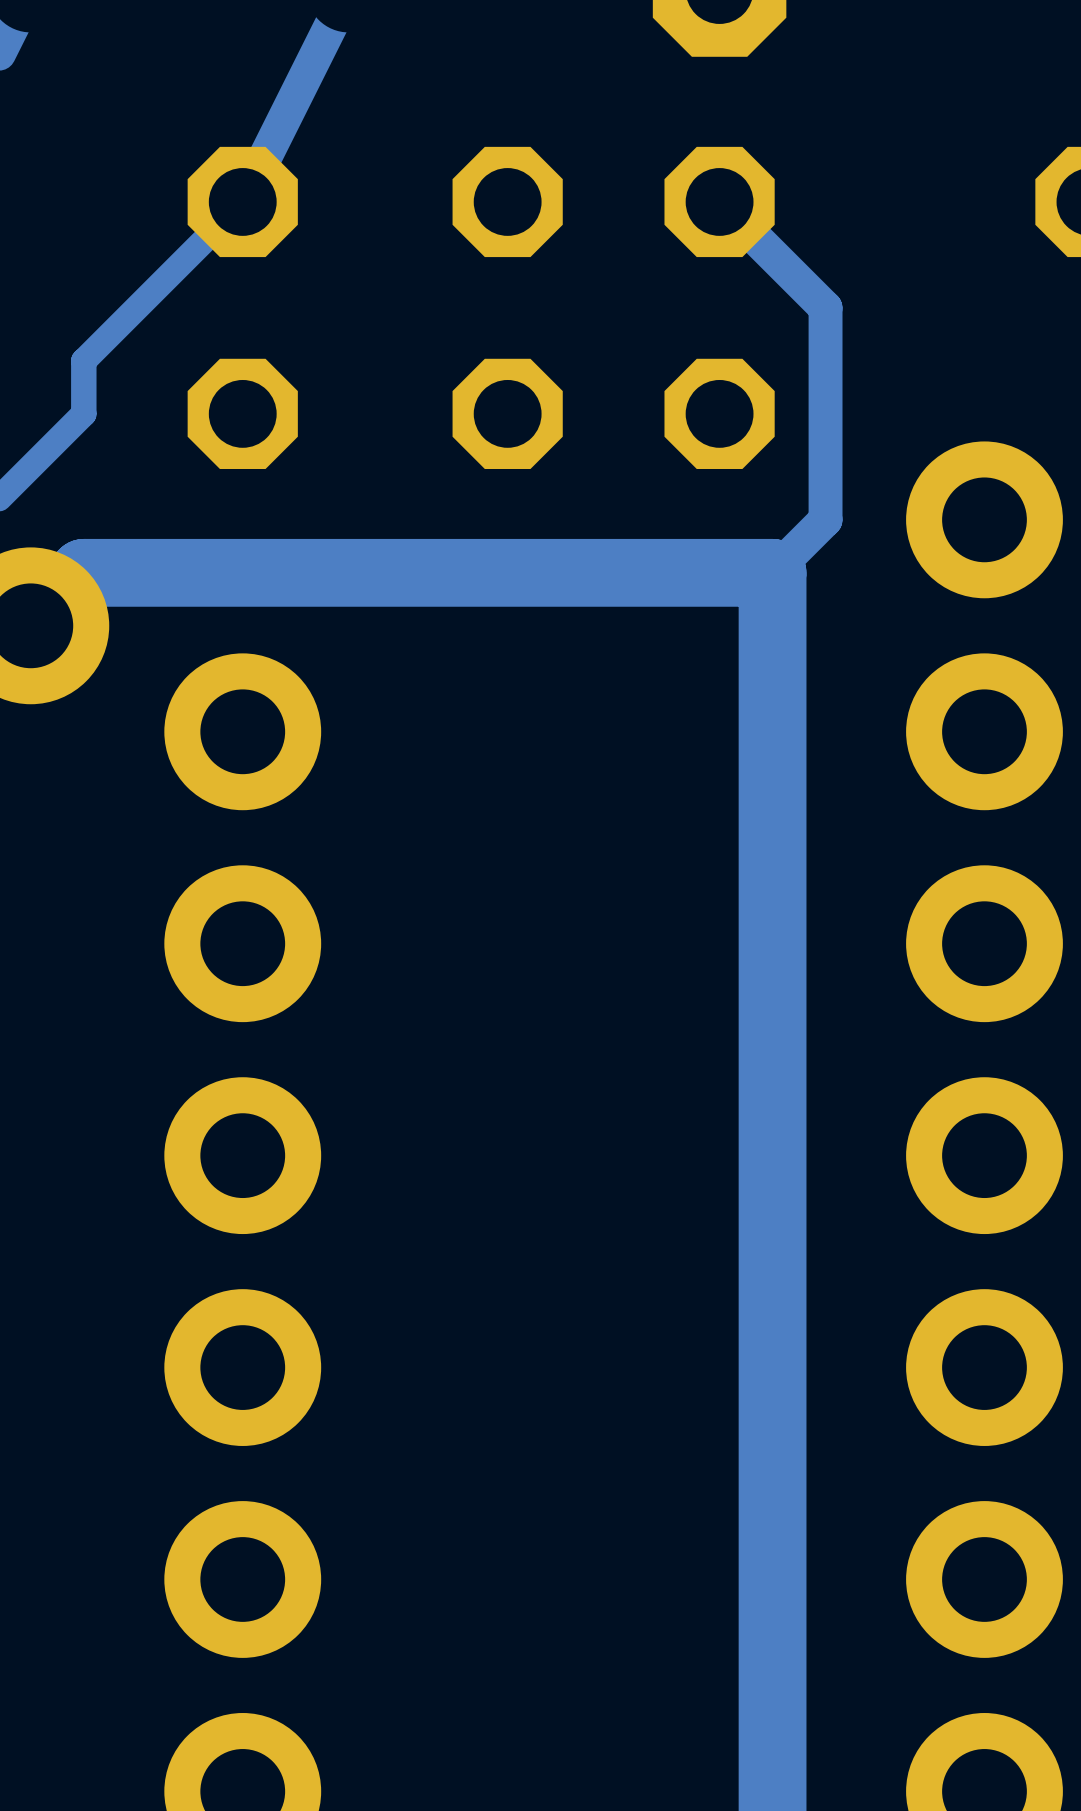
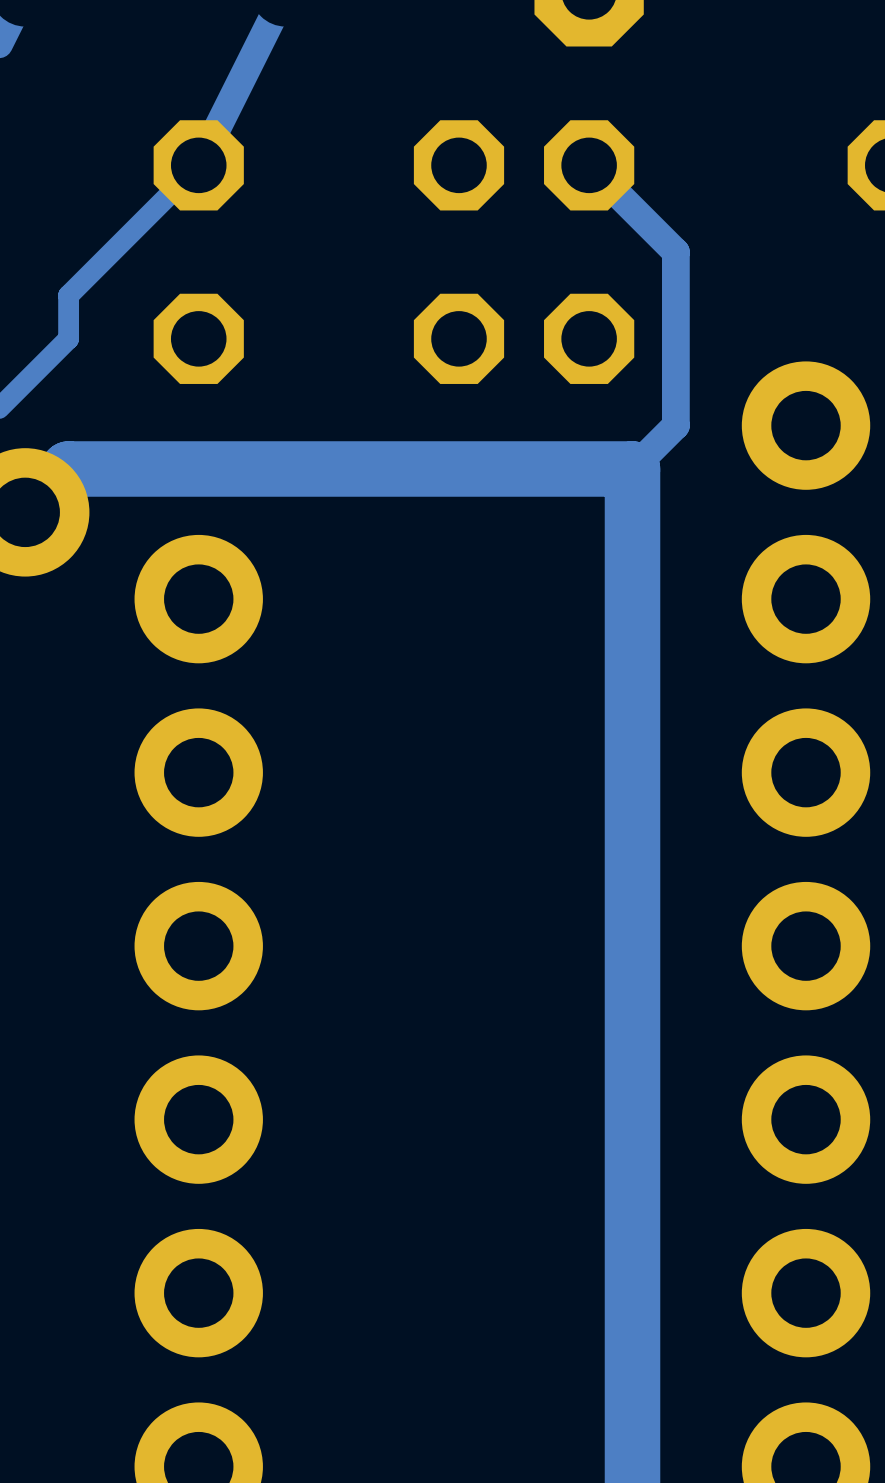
part position: (507, 307) -> (459, 252)

